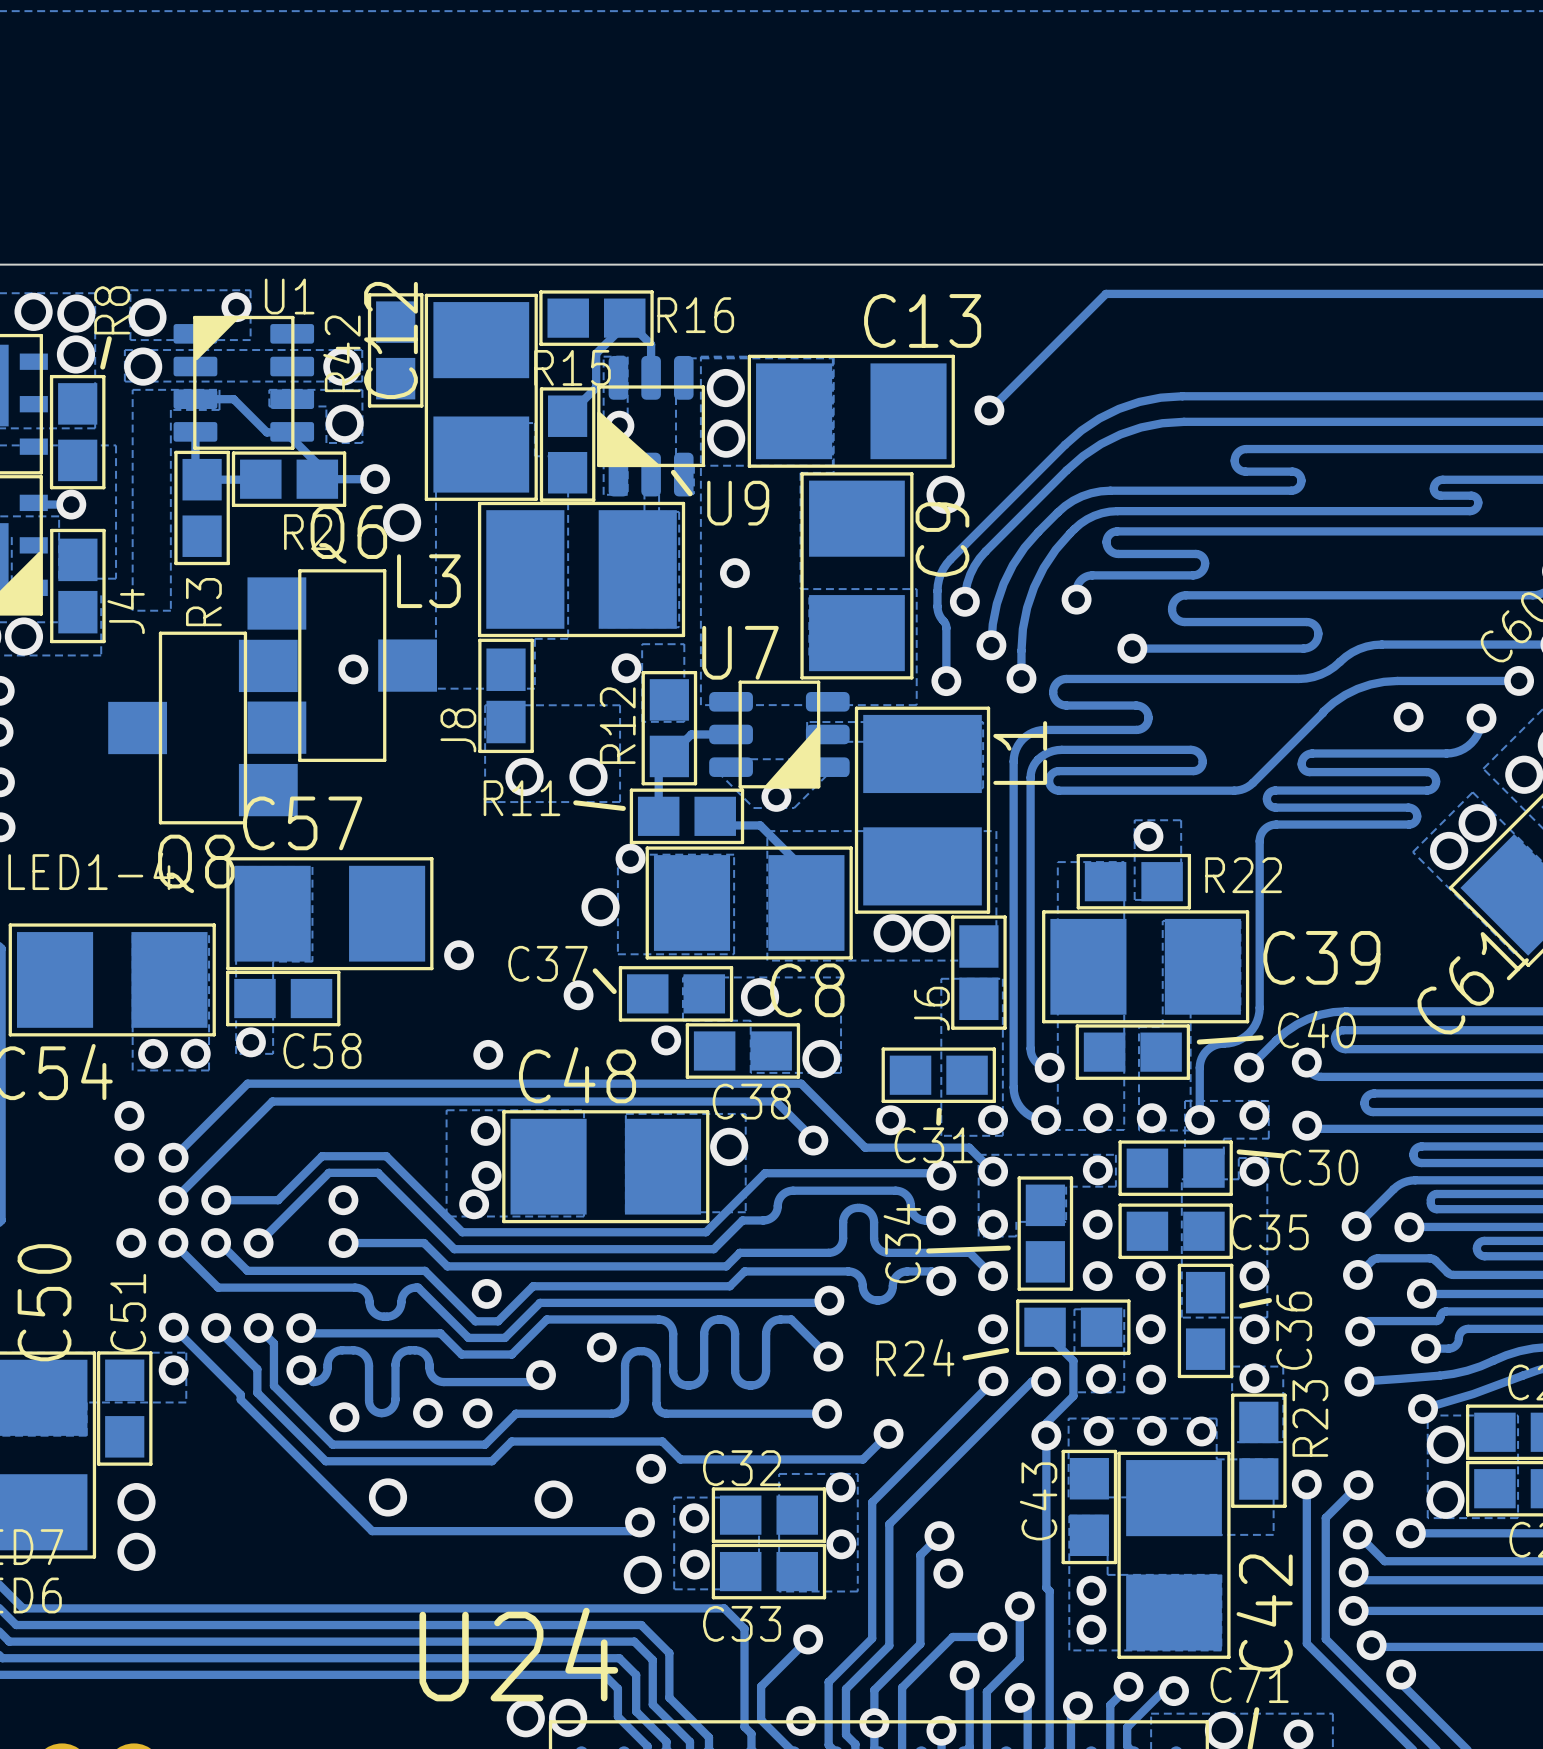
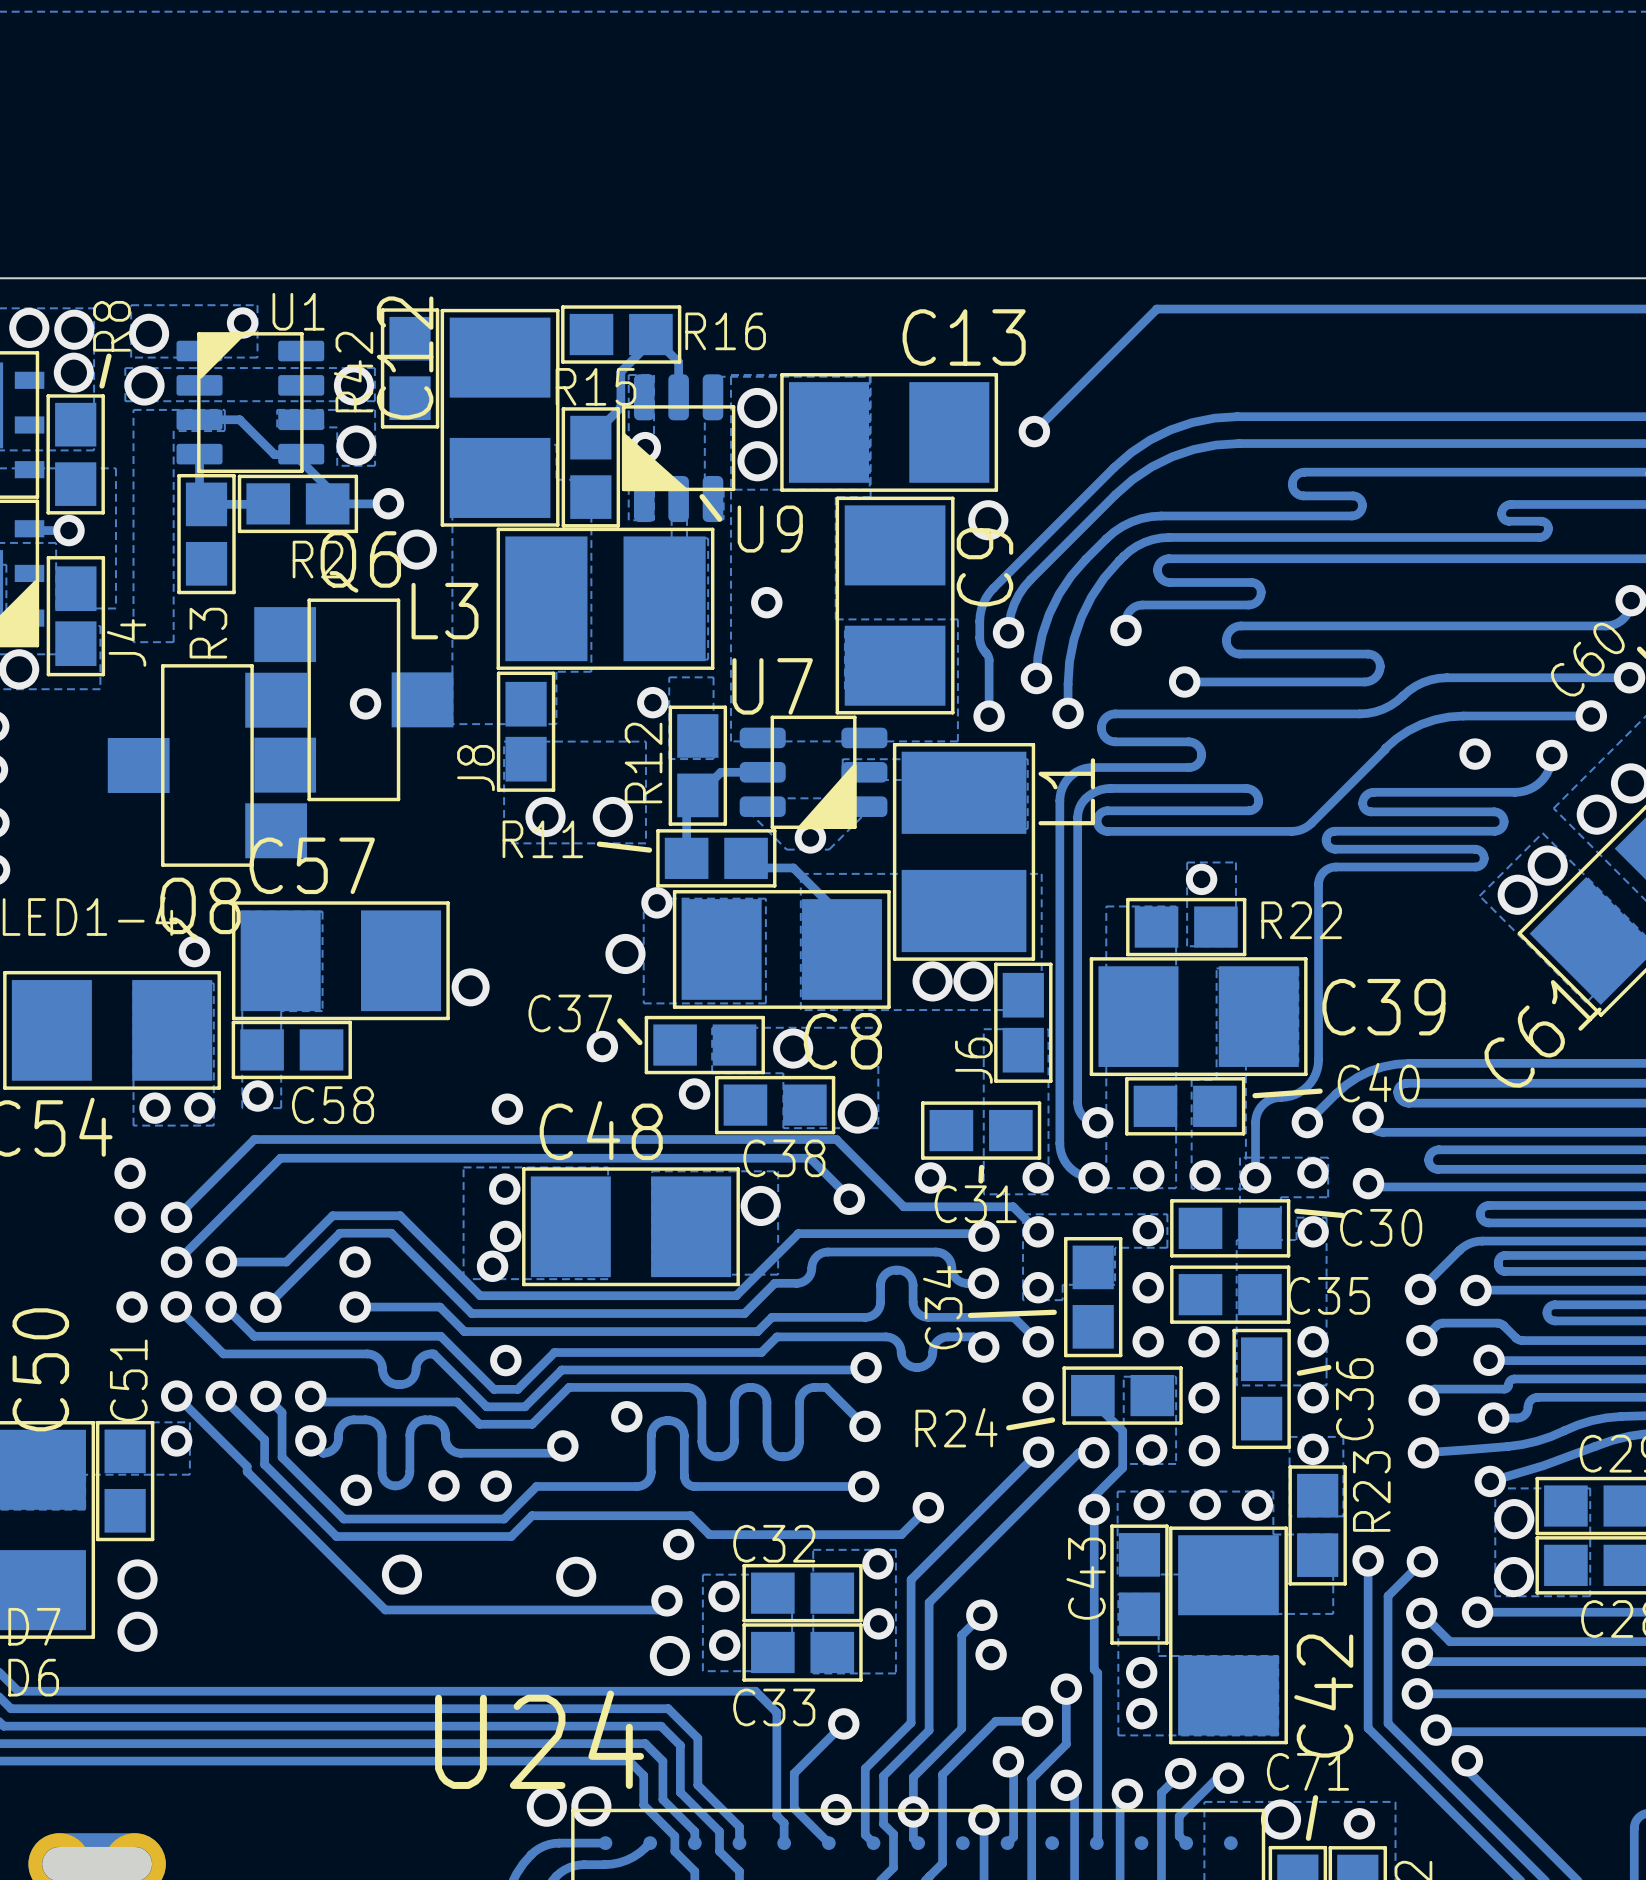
via: none -> (470, 987)
via position: (459, 955) -> (194, 951)

